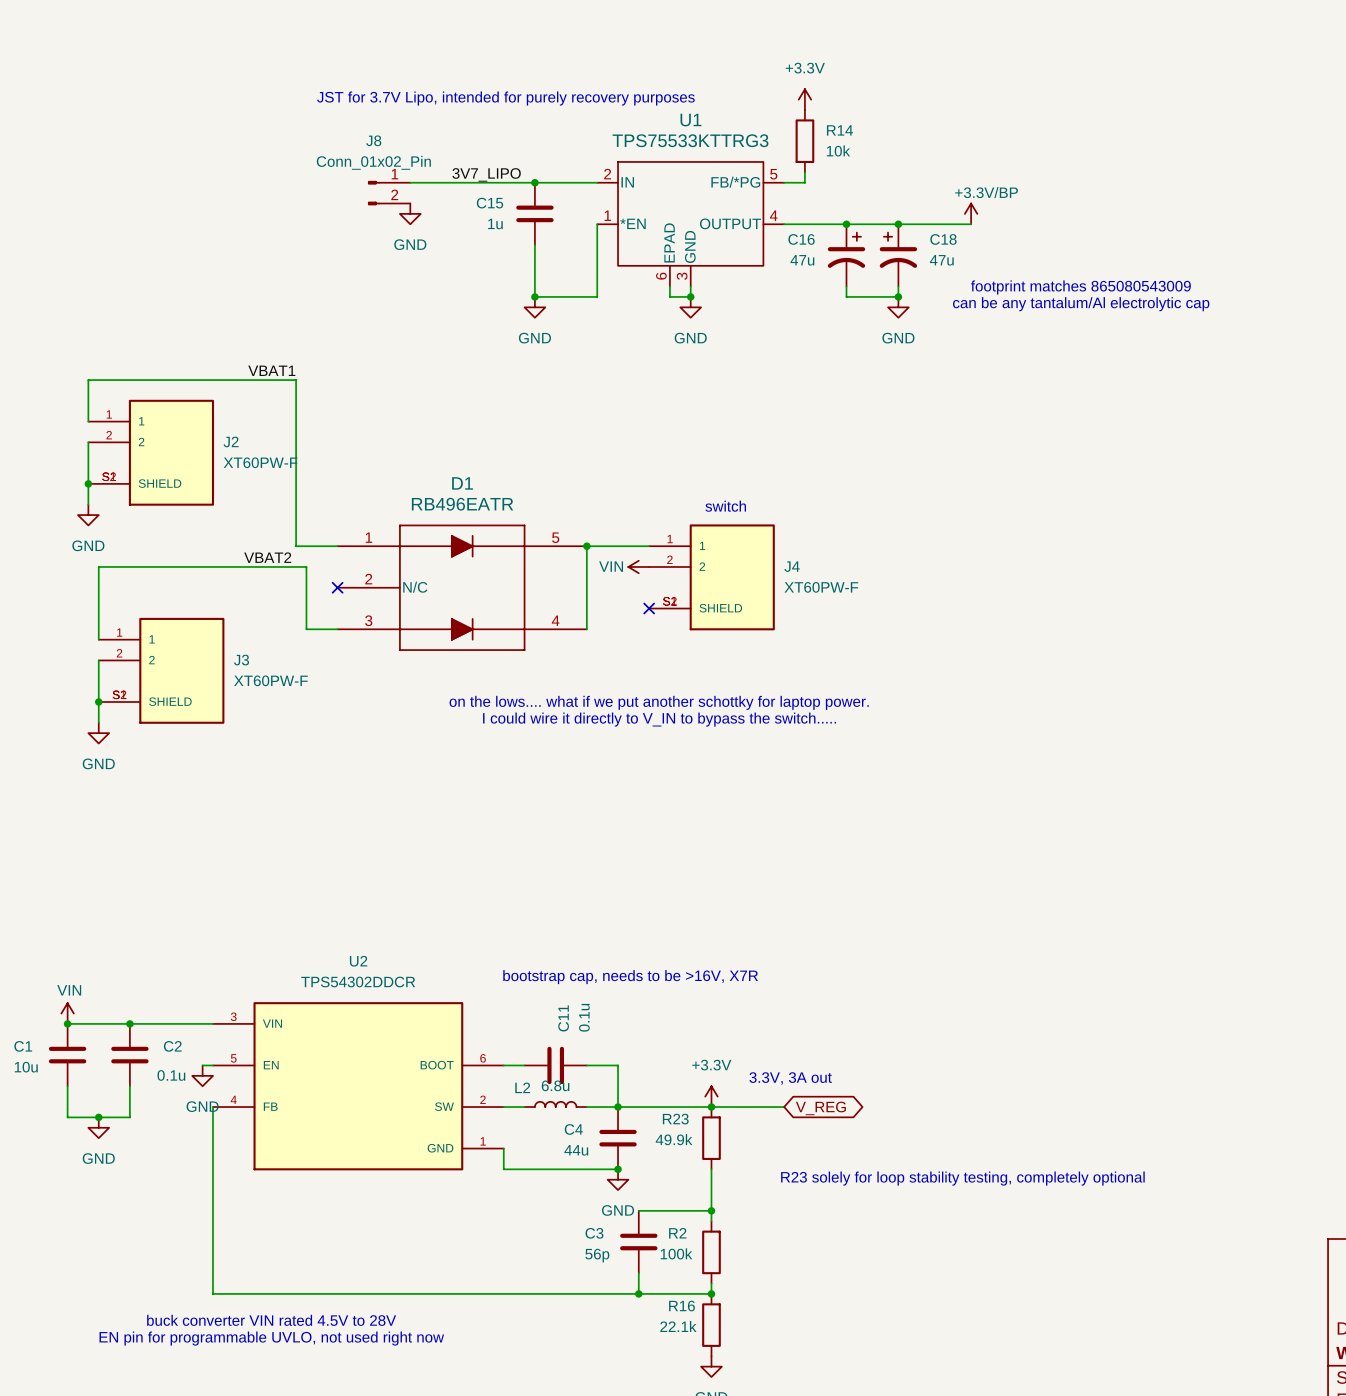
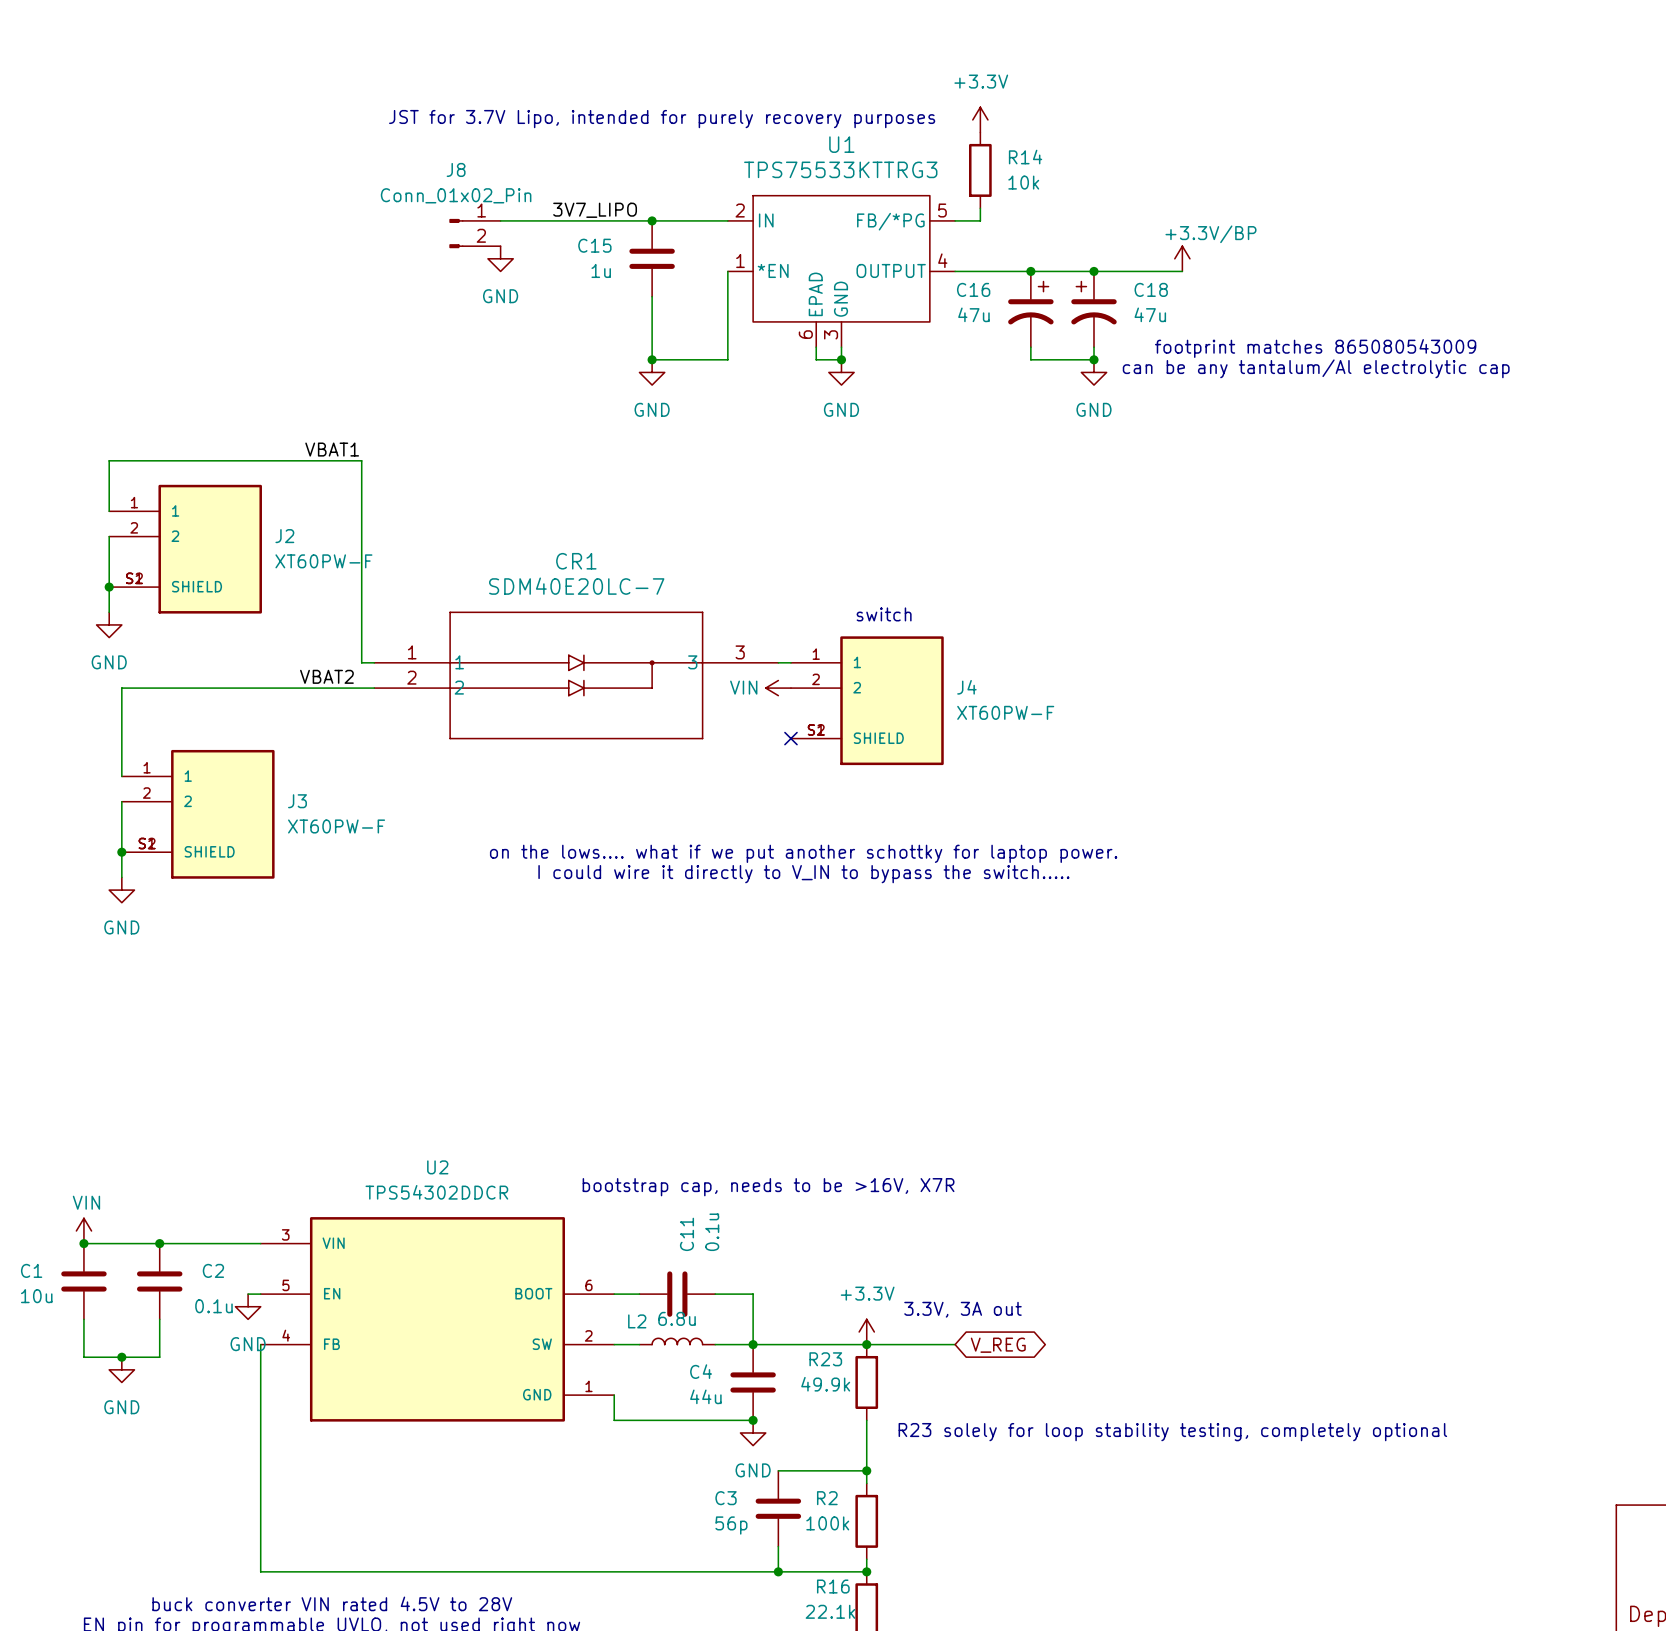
junction: (586, 546) -> none
wire: (638, 546) (586, 546) (586, 629) -> none
CR1: none -> SDM40E20LC-7 (576, 675)
wire: (306, 566) (306, 629) (337, 629) -> none
no-connect mark: (337, 587) -> none
D1: RB496EATR (462, 587) -> none

